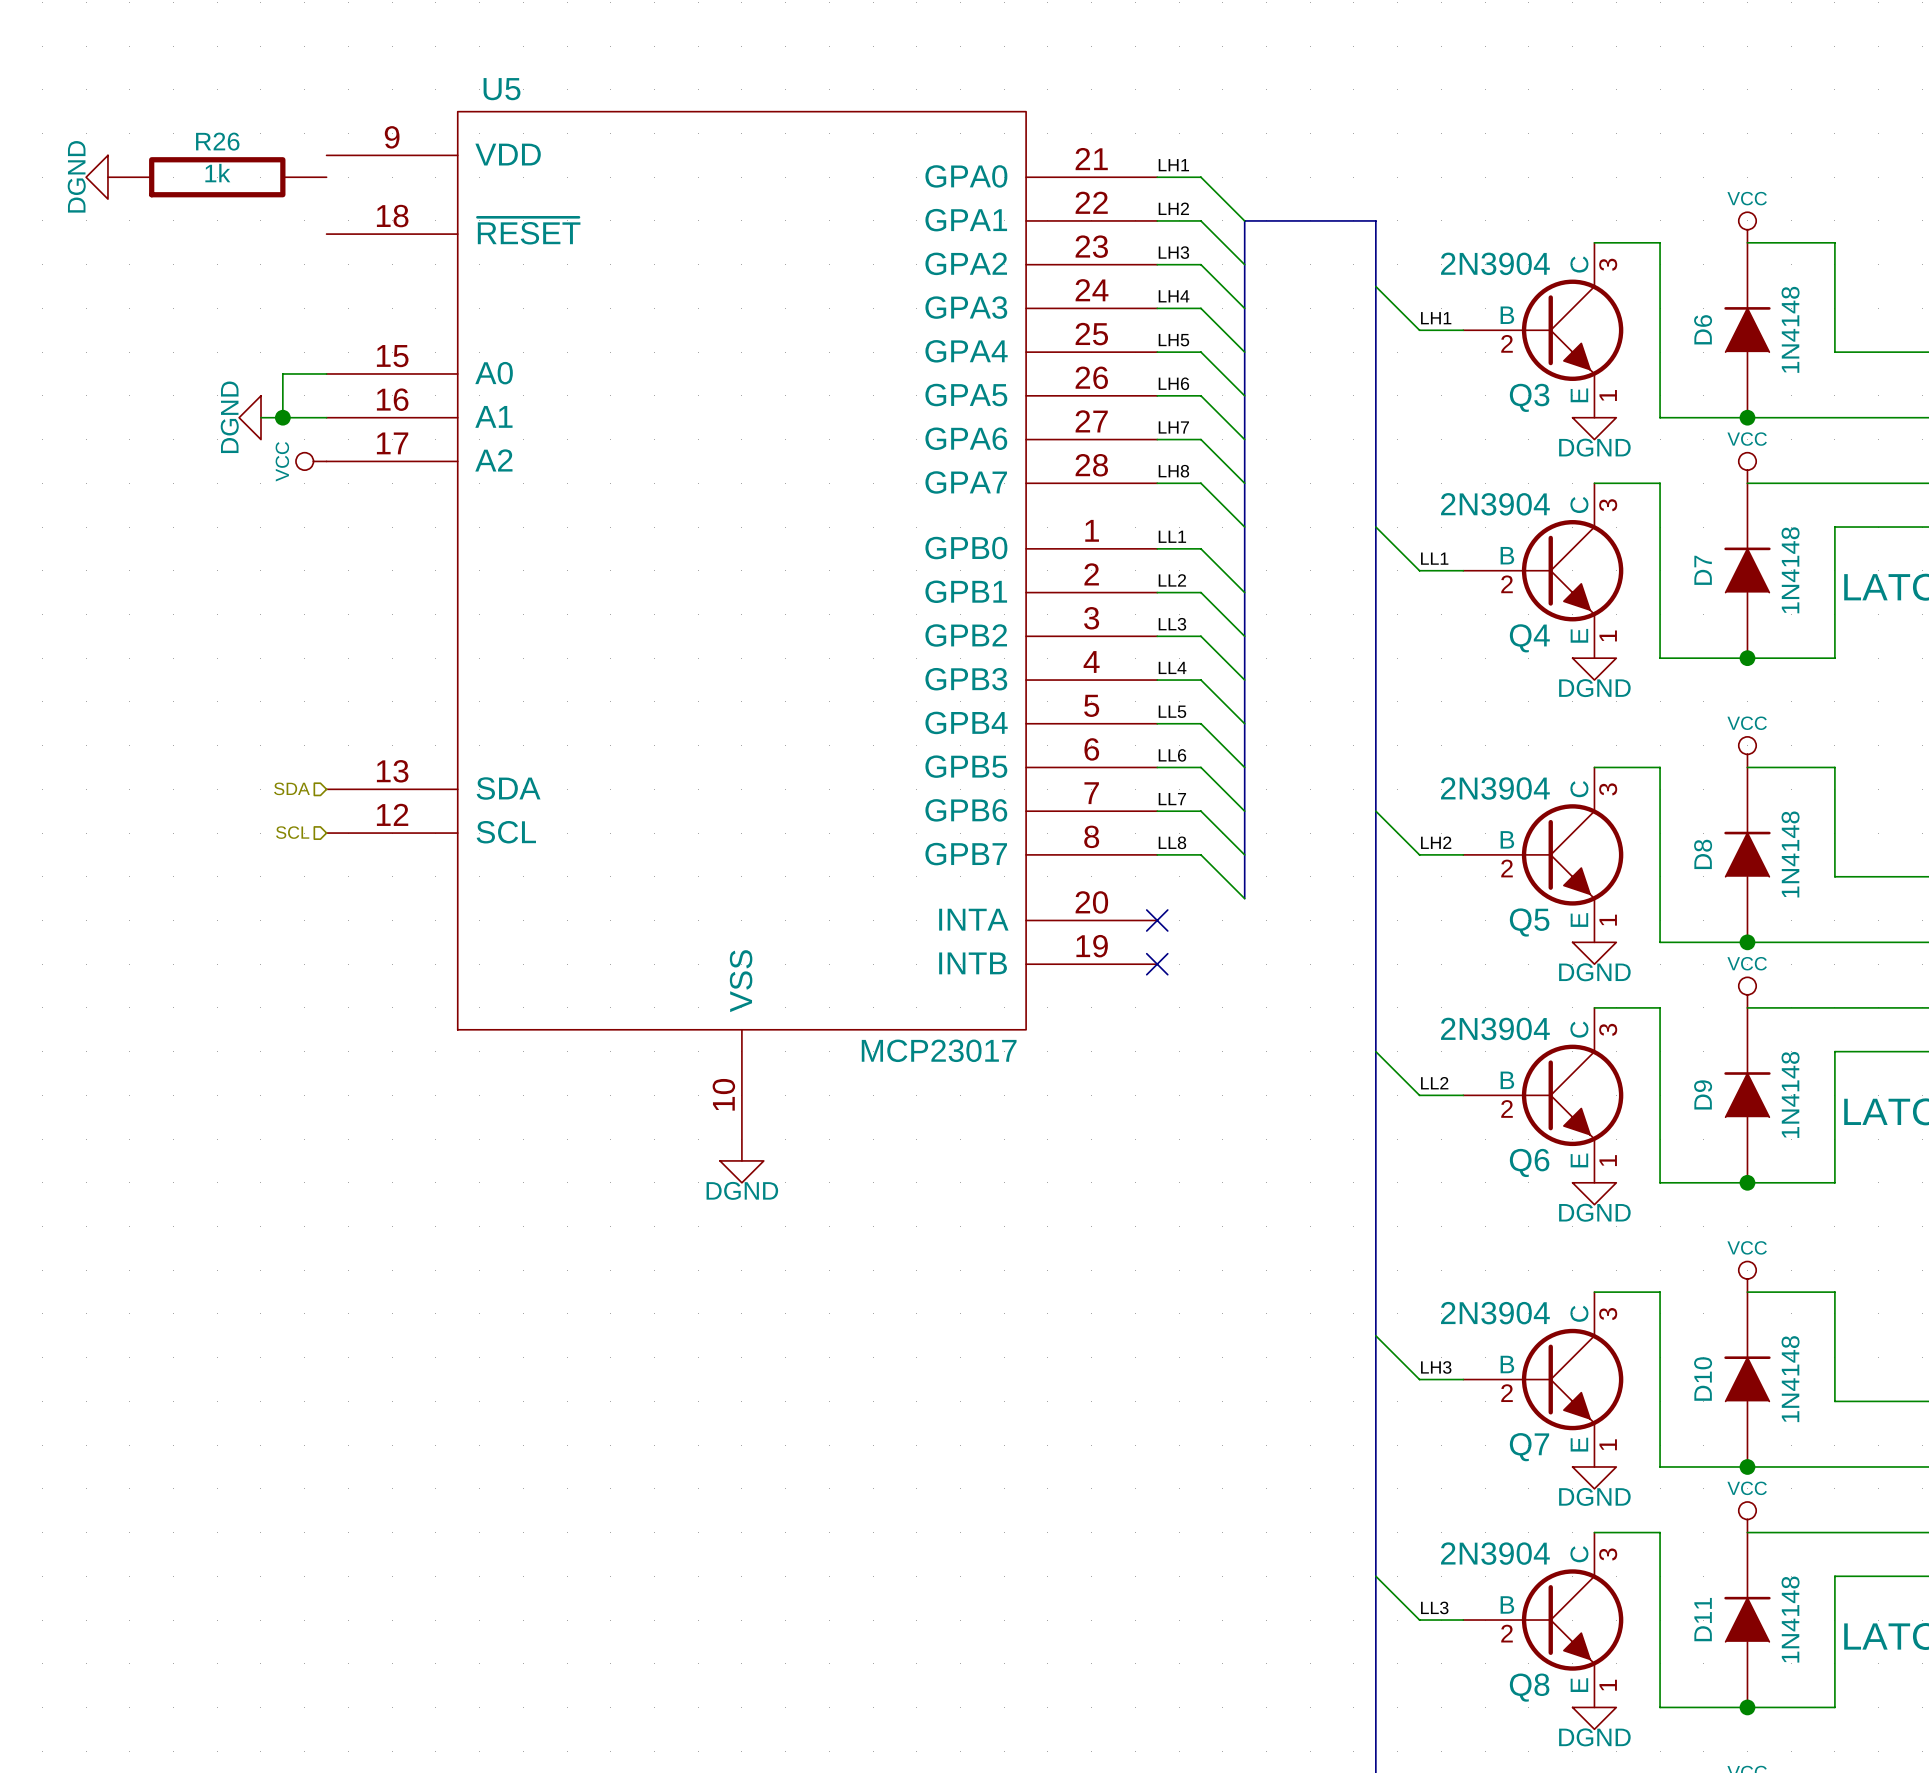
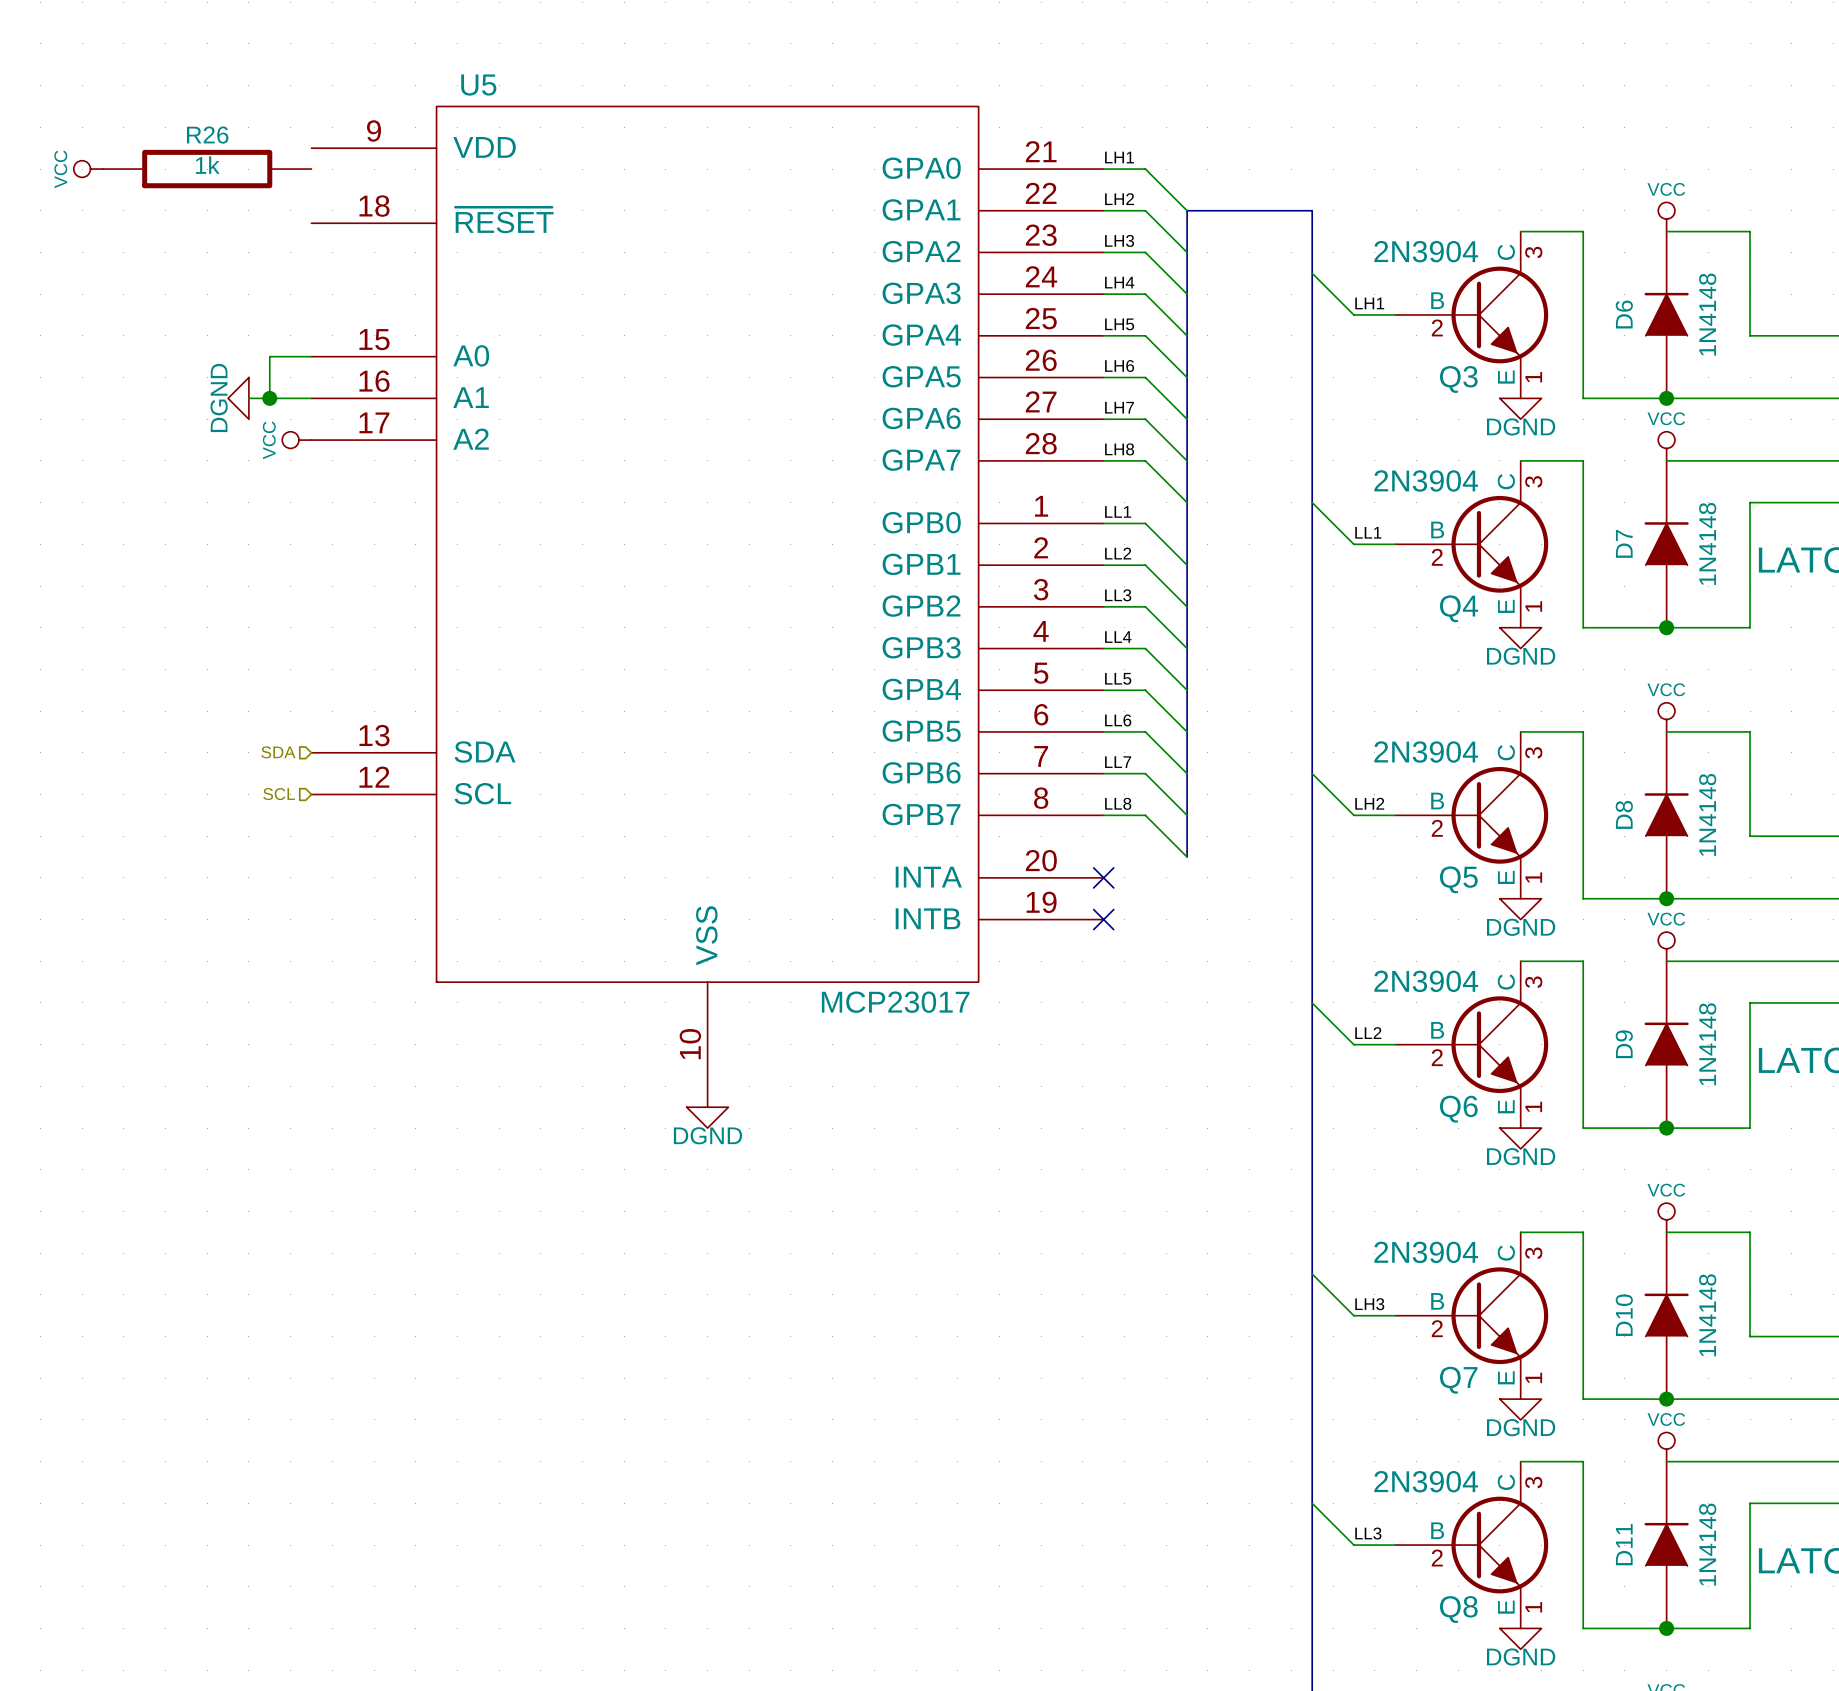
power symbol: DGND (97, 177) -> VCC (88, 169)

